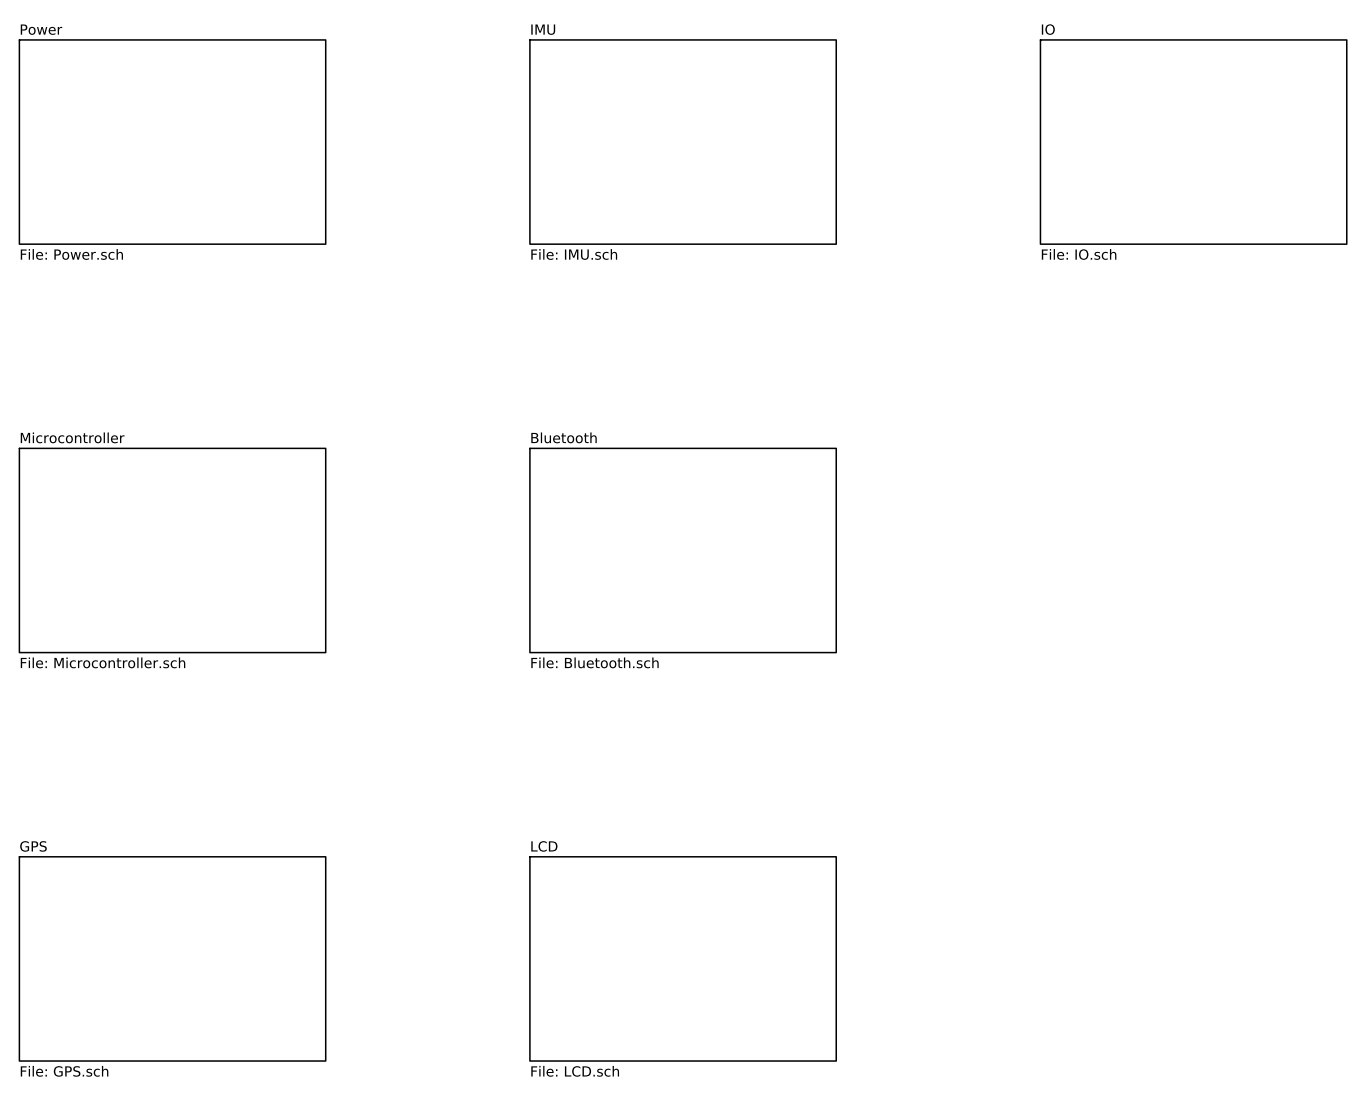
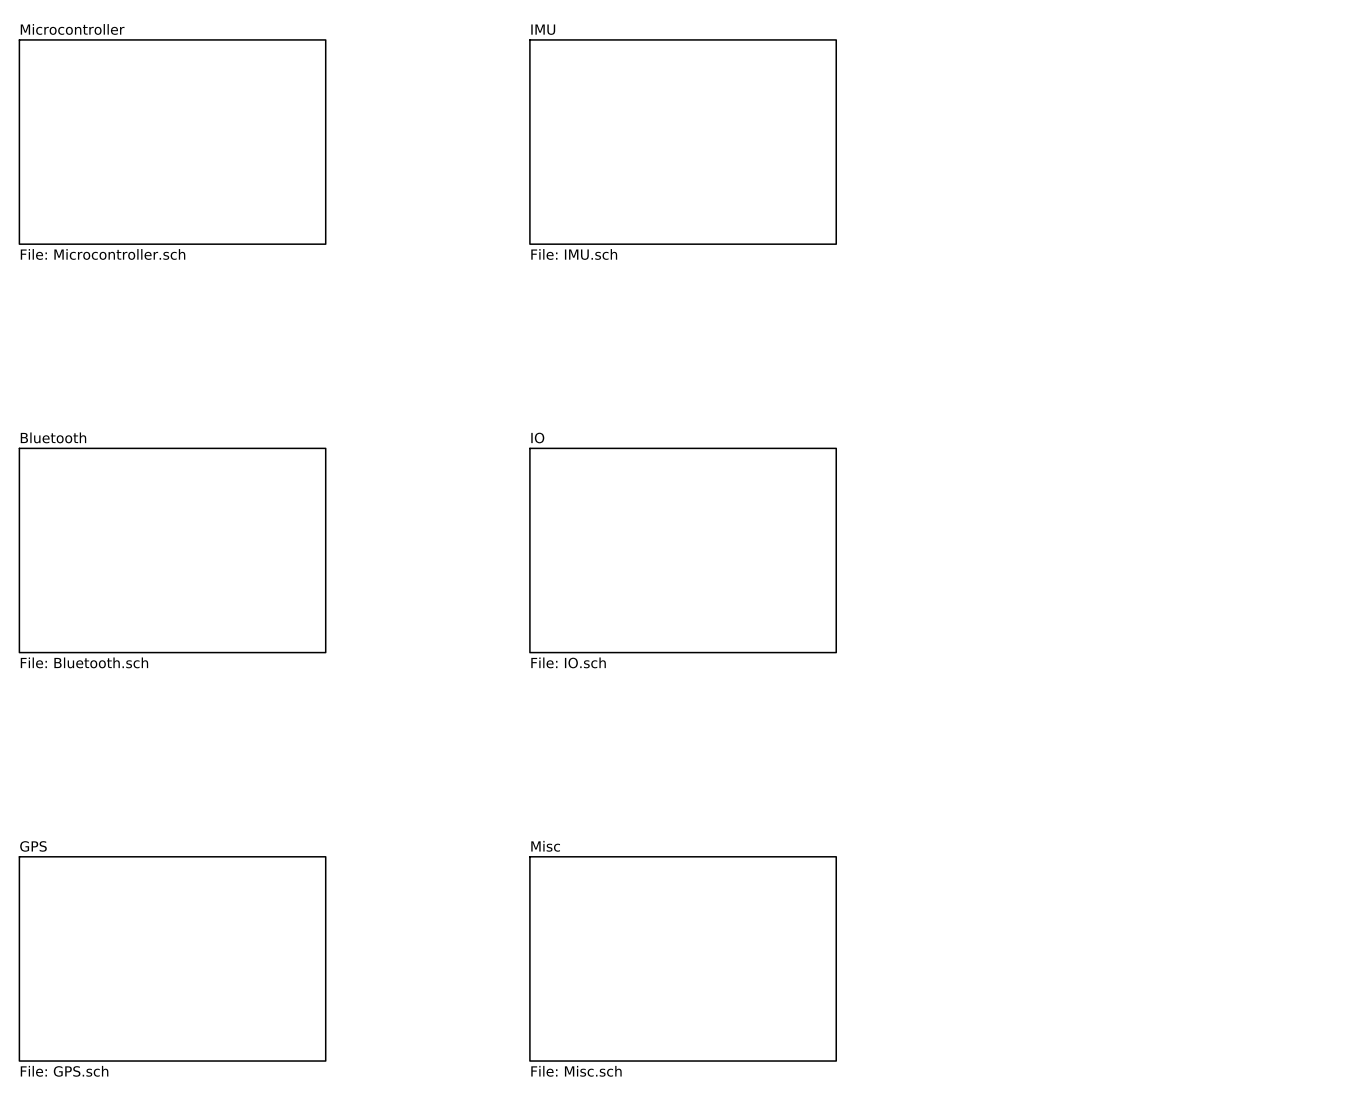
sheet Power name: Power (41, 29) -> Microcontroller (72, 29)
sheet IO: File: IO.sch (1193, 142) -> none
sheet Power value: File: Power.sch (71, 254) -> File: Microcontroller.sch (103, 254)
sheet Microcontroller name: Microcontroller (72, 437) -> Bluetooth (53, 437)
sheet Bluetooth name: Bluetooth (564, 437) -> IO (537, 438)
sheet Microcontroller value: File: Microcontroller.sch (103, 662) -> File: Bluetooth.sch (84, 662)
sheet Bluetooth value: File: Bluetooth.sch (594, 662) -> File: IO.sch (568, 662)
sheet LCD name: LCD (544, 846) -> Misc (545, 846)
sheet LCD value: File: LCD.sch (575, 1071) -> File: Misc.sch (576, 1071)

